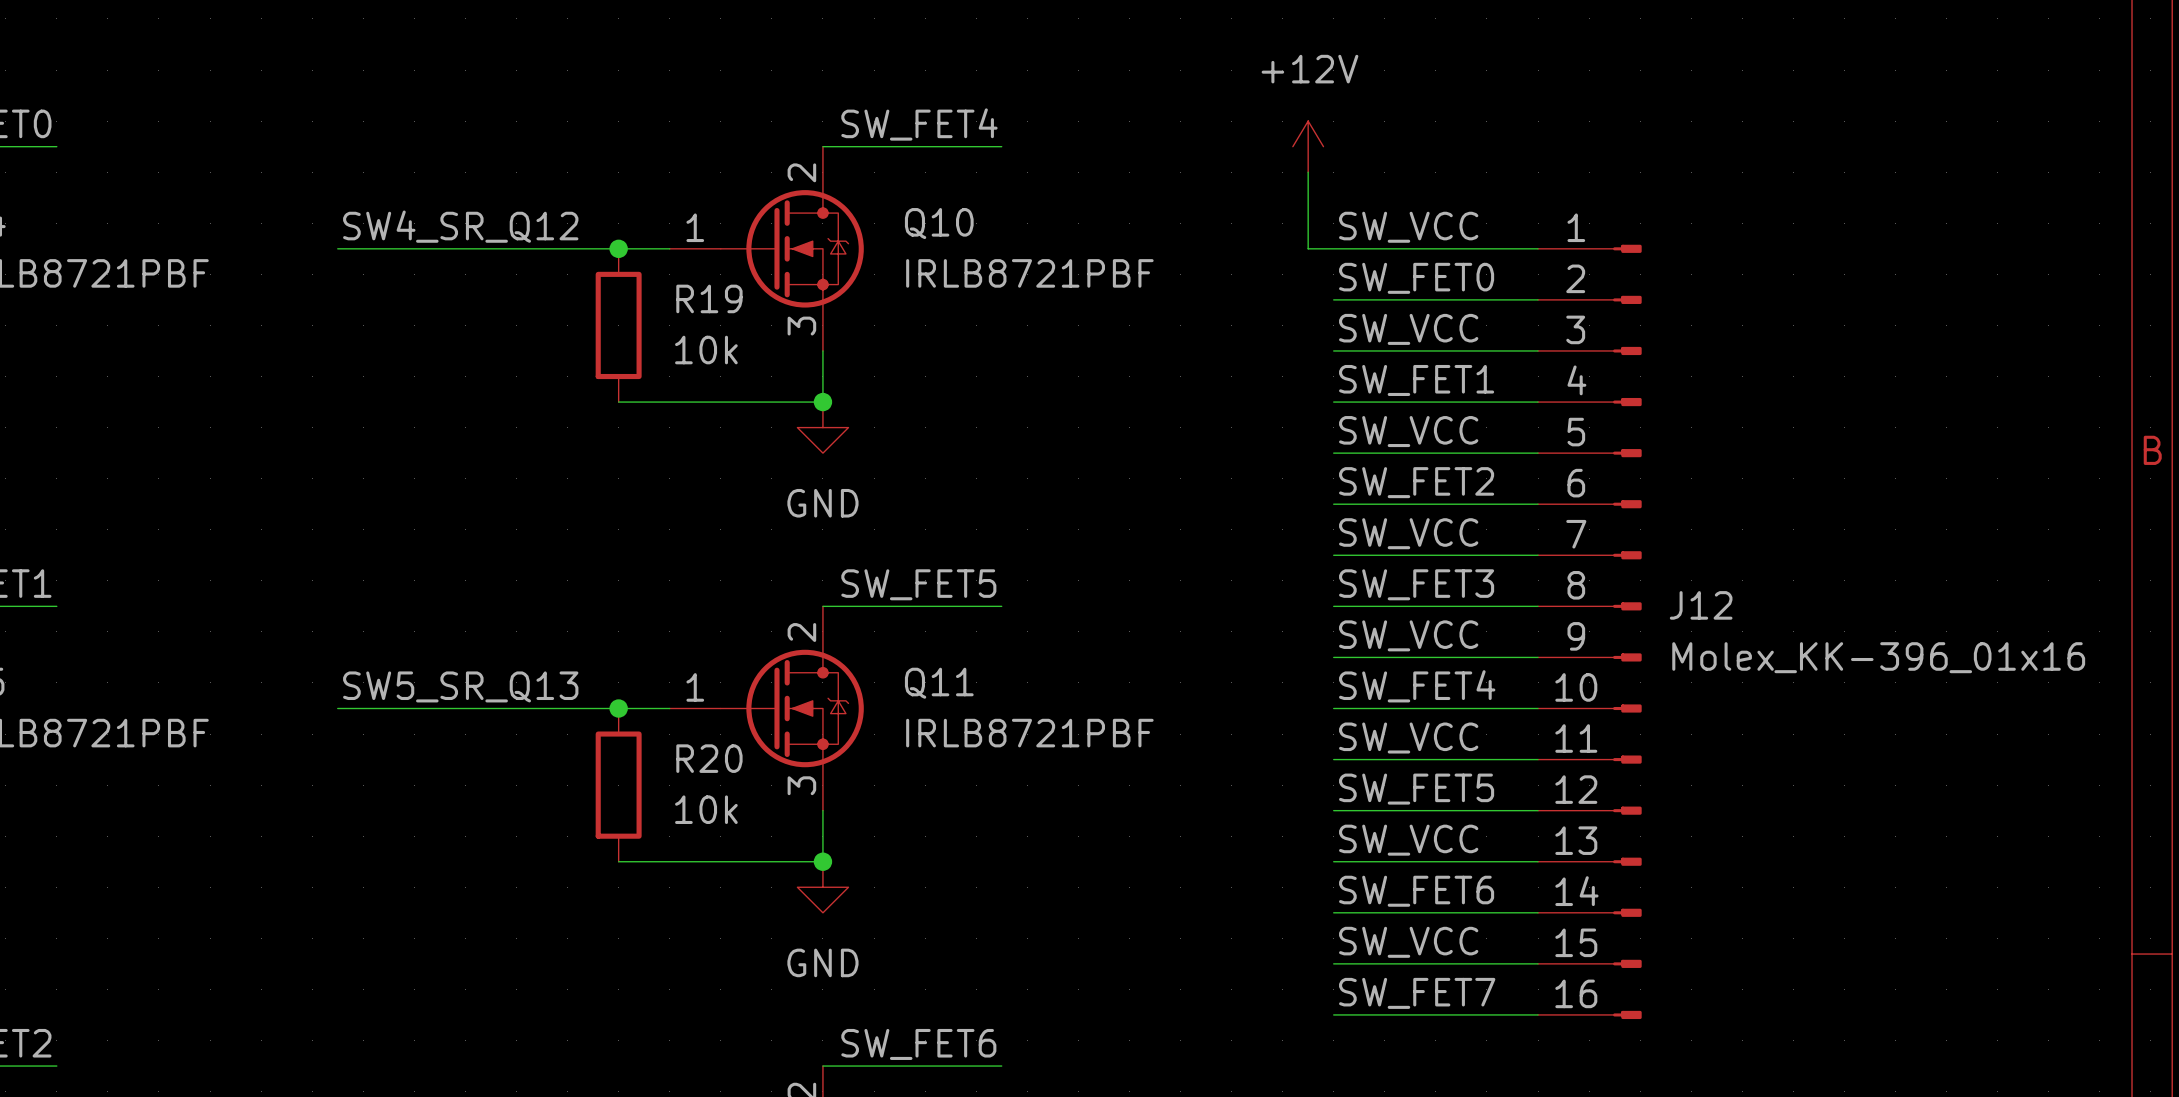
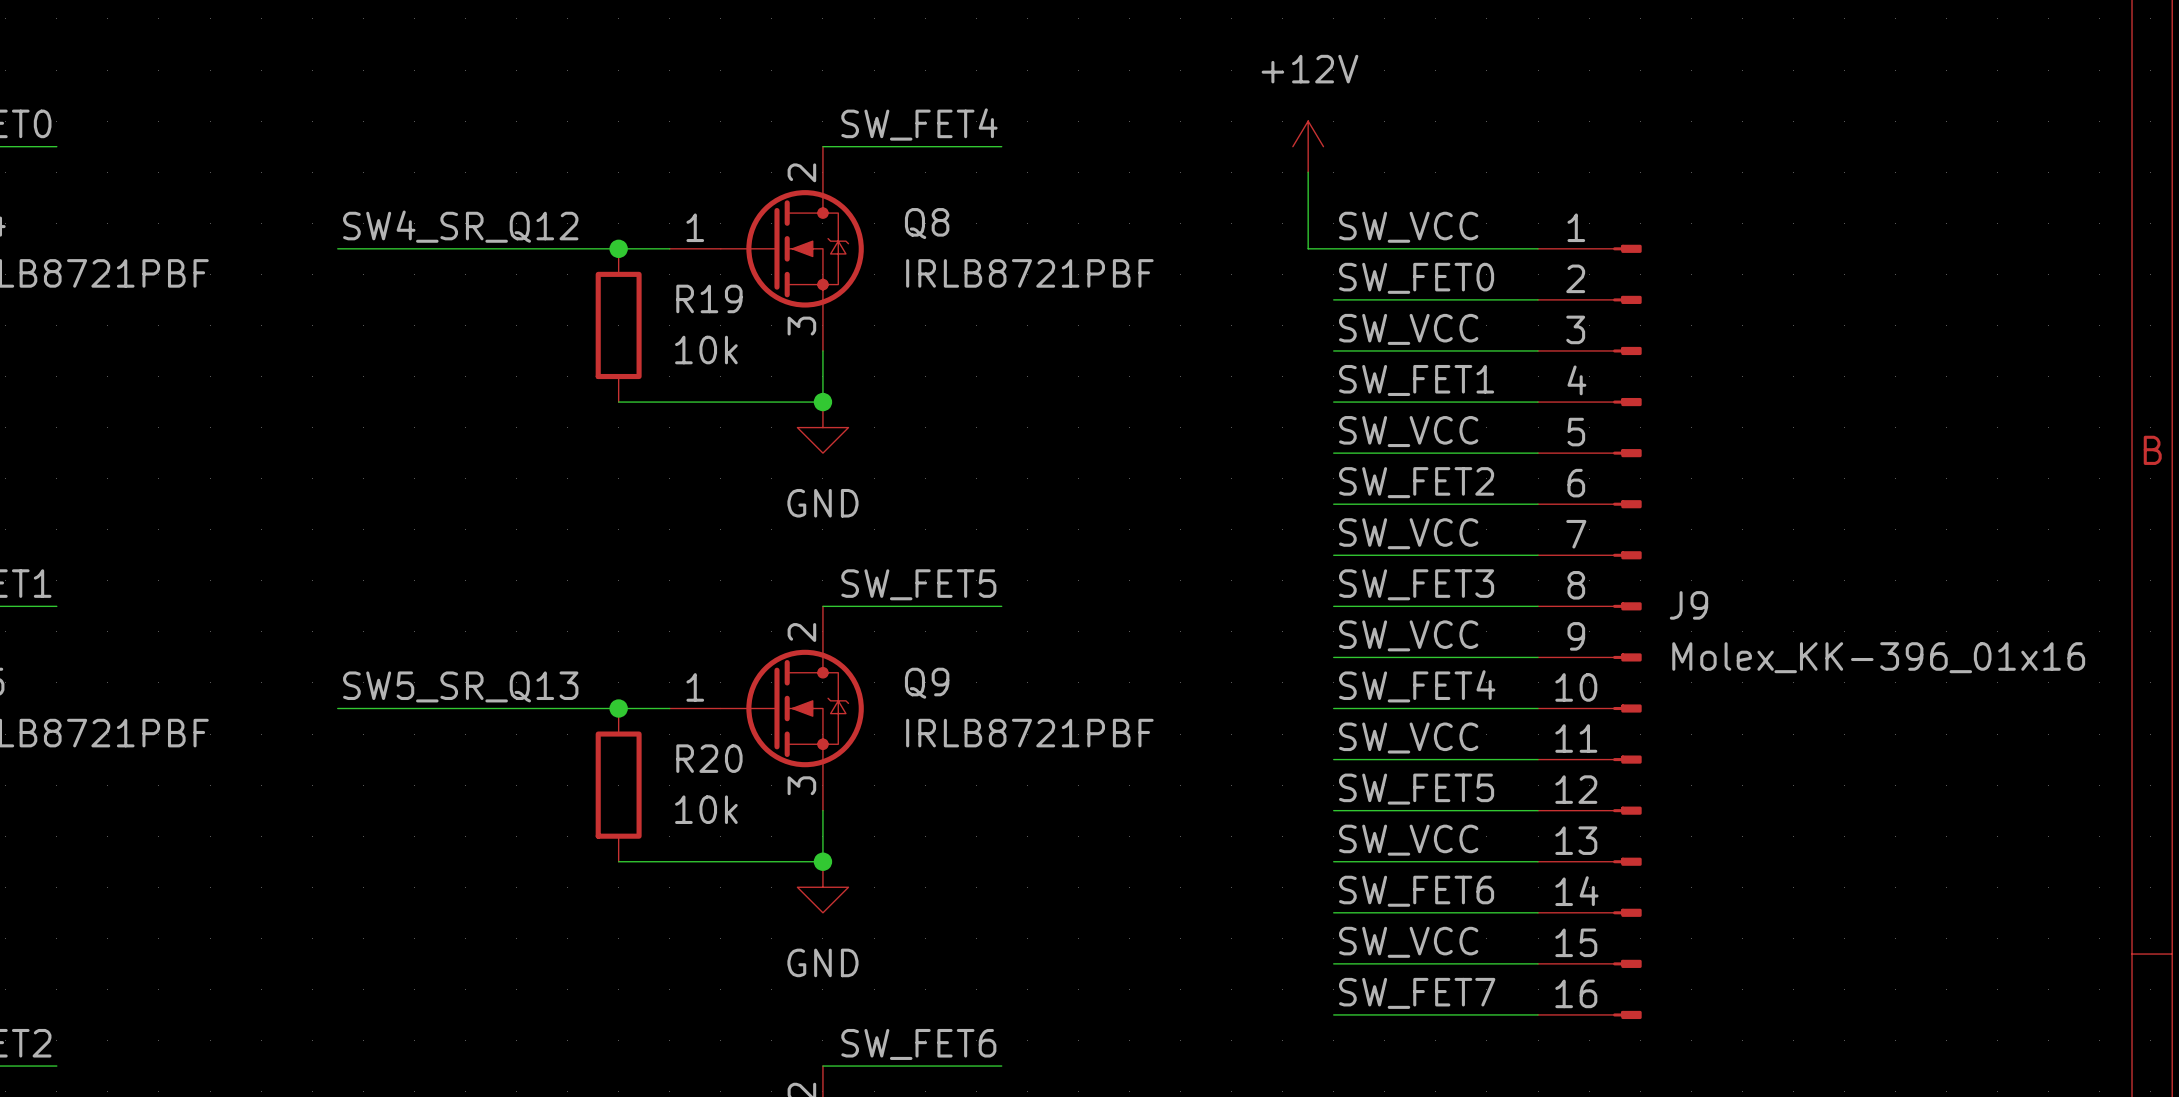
Q10 name: Q10 (939, 223) -> Q8 (927, 223)
J12 name: J12 (1701, 605) -> J9 (1688, 605)
Q11 name: Q11 (939, 683) -> Q9 (927, 683)

